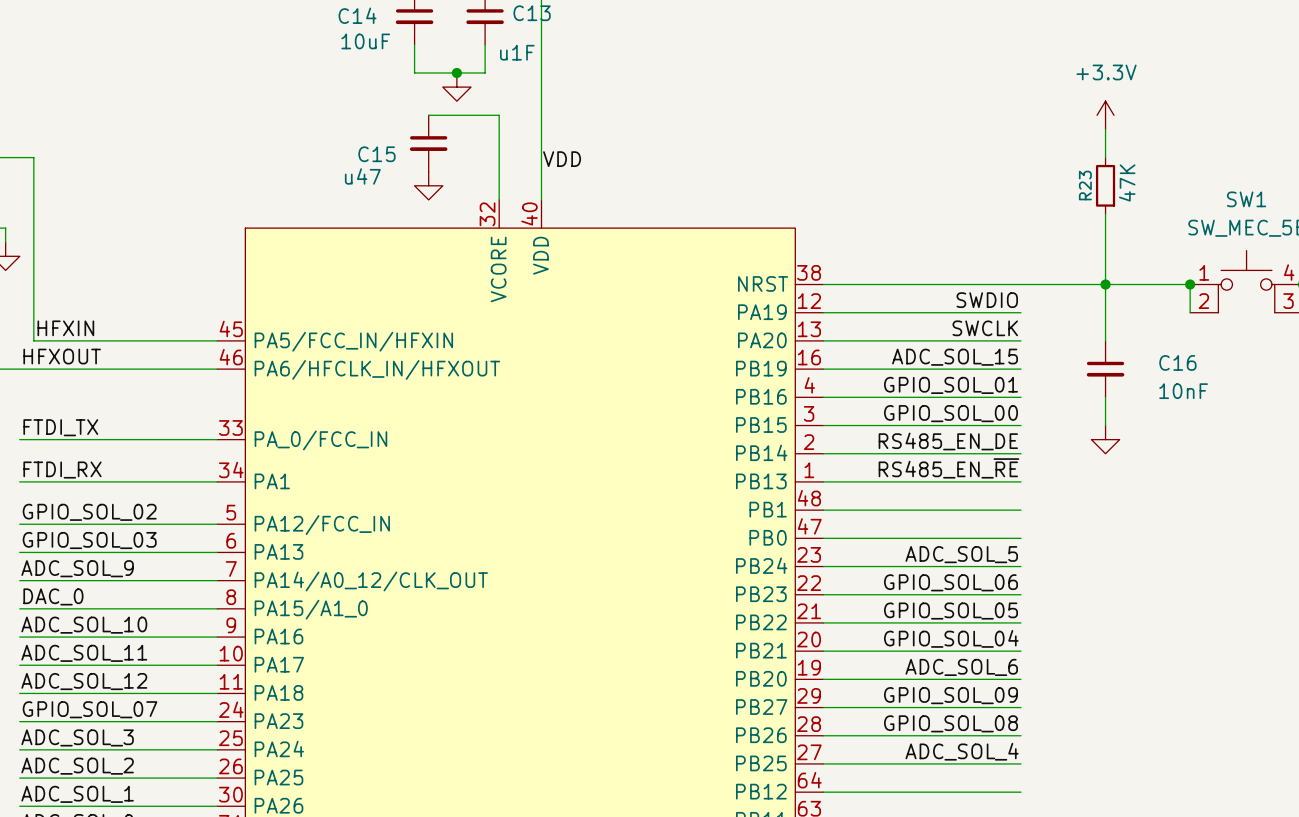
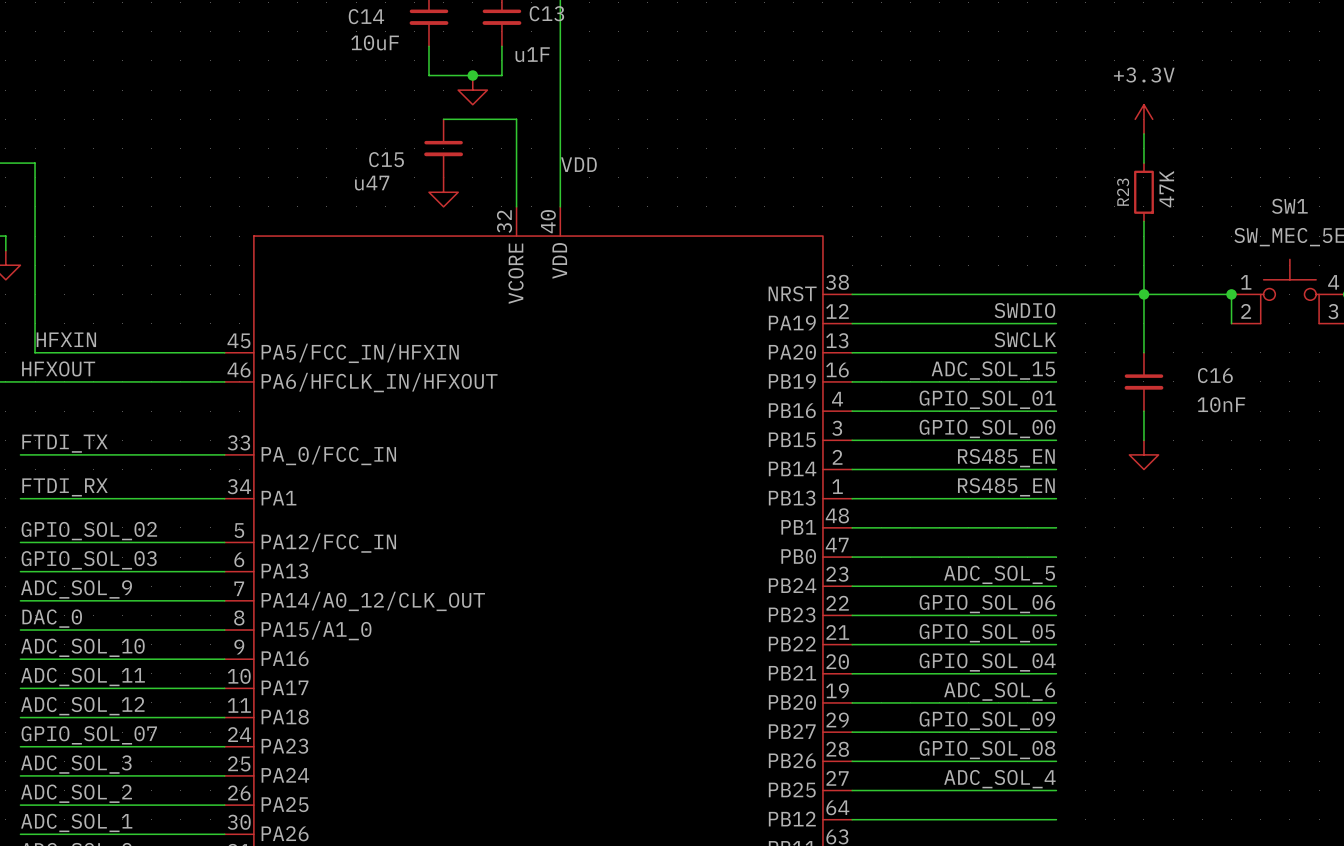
label: RS485_EN_DE (948, 441) -> RS485_EN (1006, 458)
label: RS485_EN_~{RE} (948, 468) -> RS485_EN (1006, 487)

